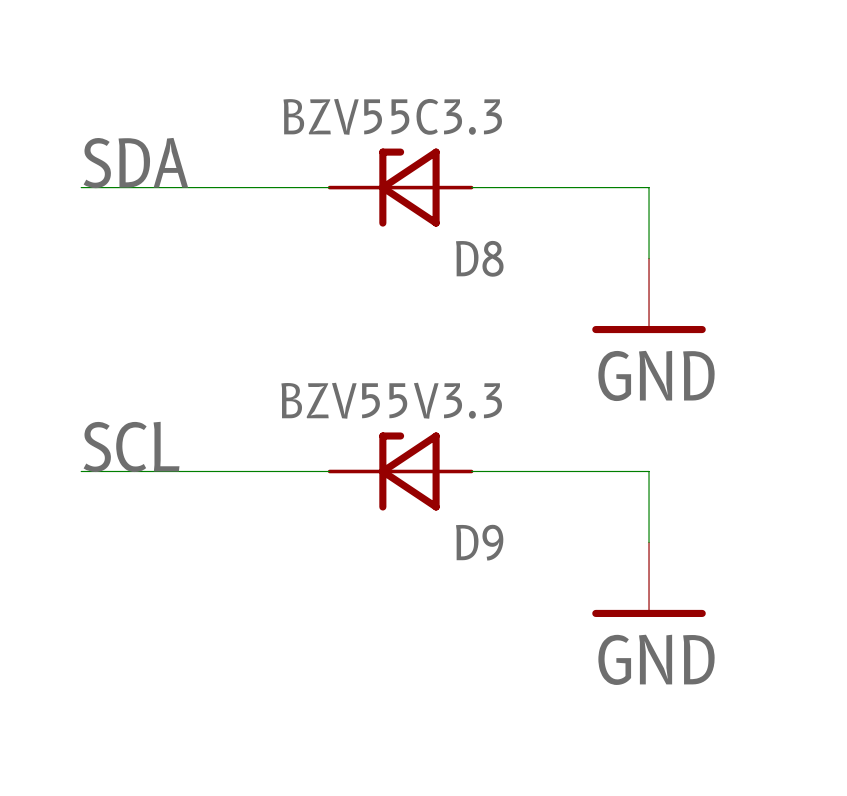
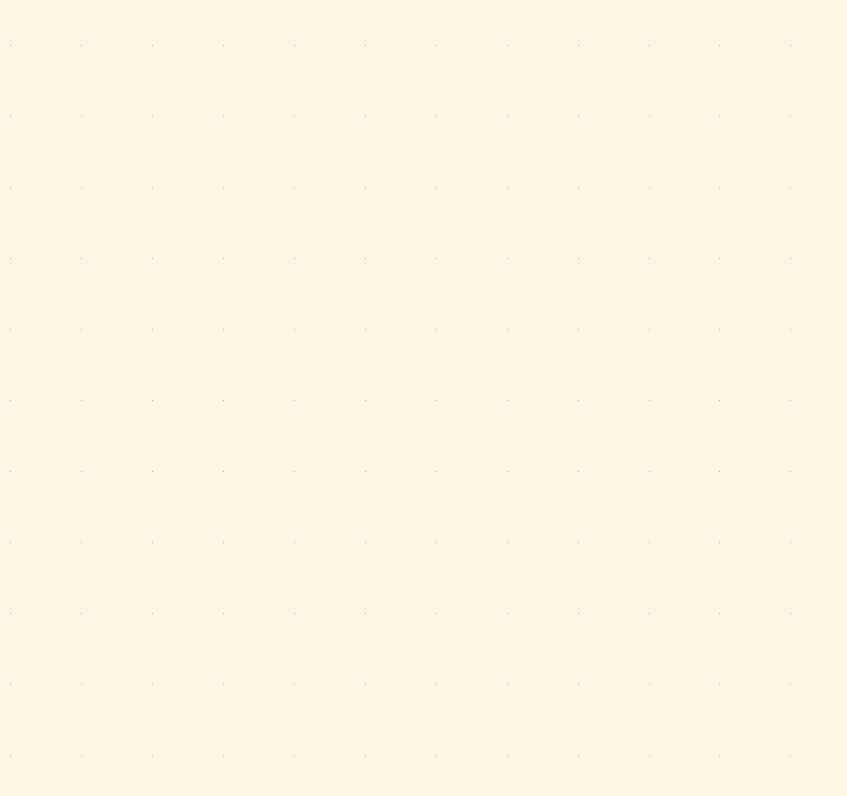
label: SDA (135, 163) -> none
wire: (81, 187) (329, 187) -> none
D8: BZV55C3.3 (400, 187) -> none
wire: (471, 187) (649, 187) (649, 258) -> none
power symbol: GND (649, 295) -> none
label: SCL (131, 446) -> none
wire: (81, 471) (329, 471) -> none
D9: BZV55V3.3 (400, 471) -> none
wire: (471, 471) (649, 471) (649, 542) -> none
power symbol: GND (649, 579) -> none

